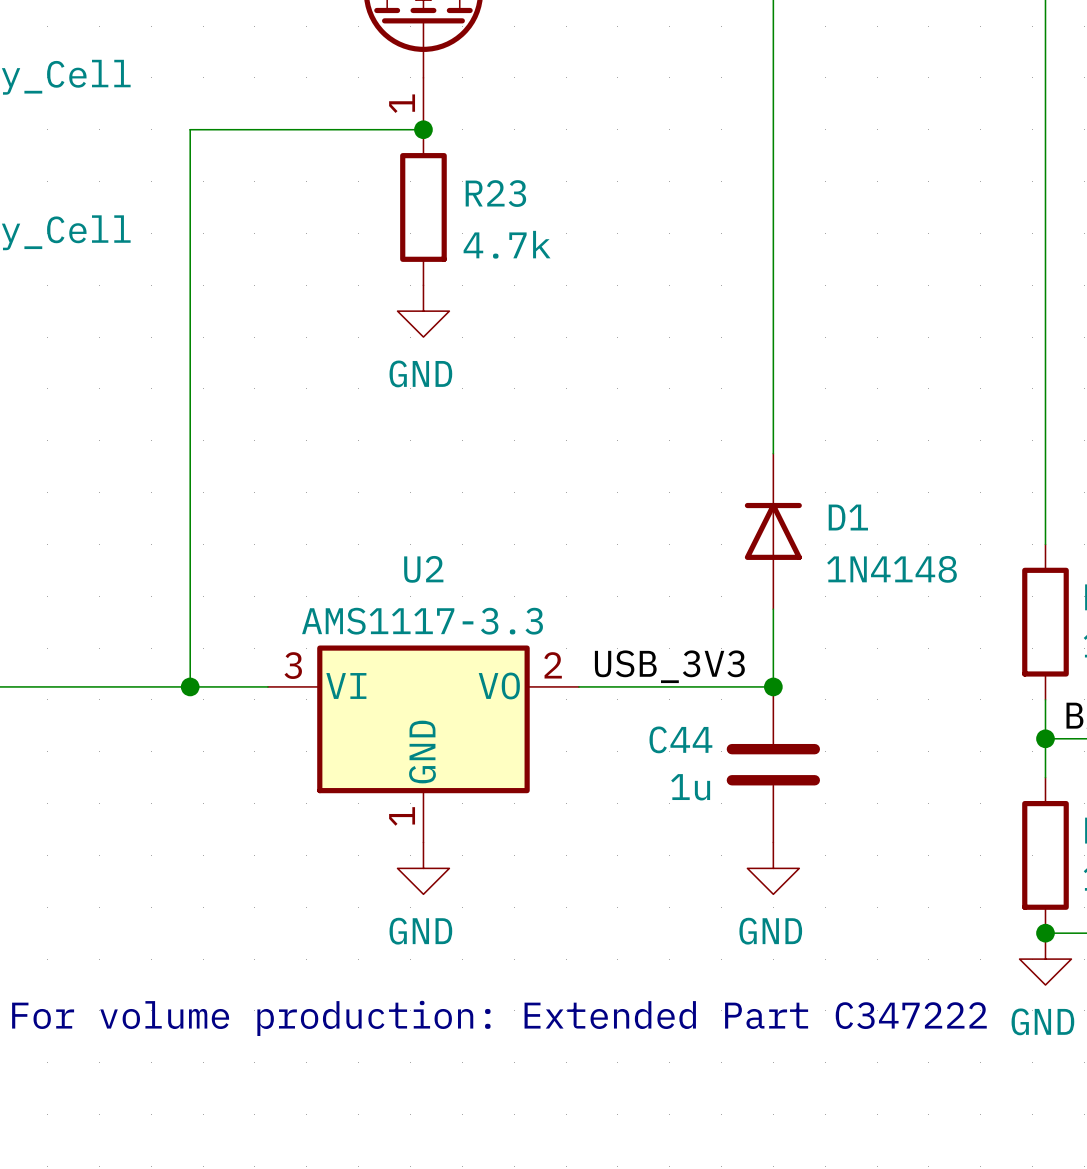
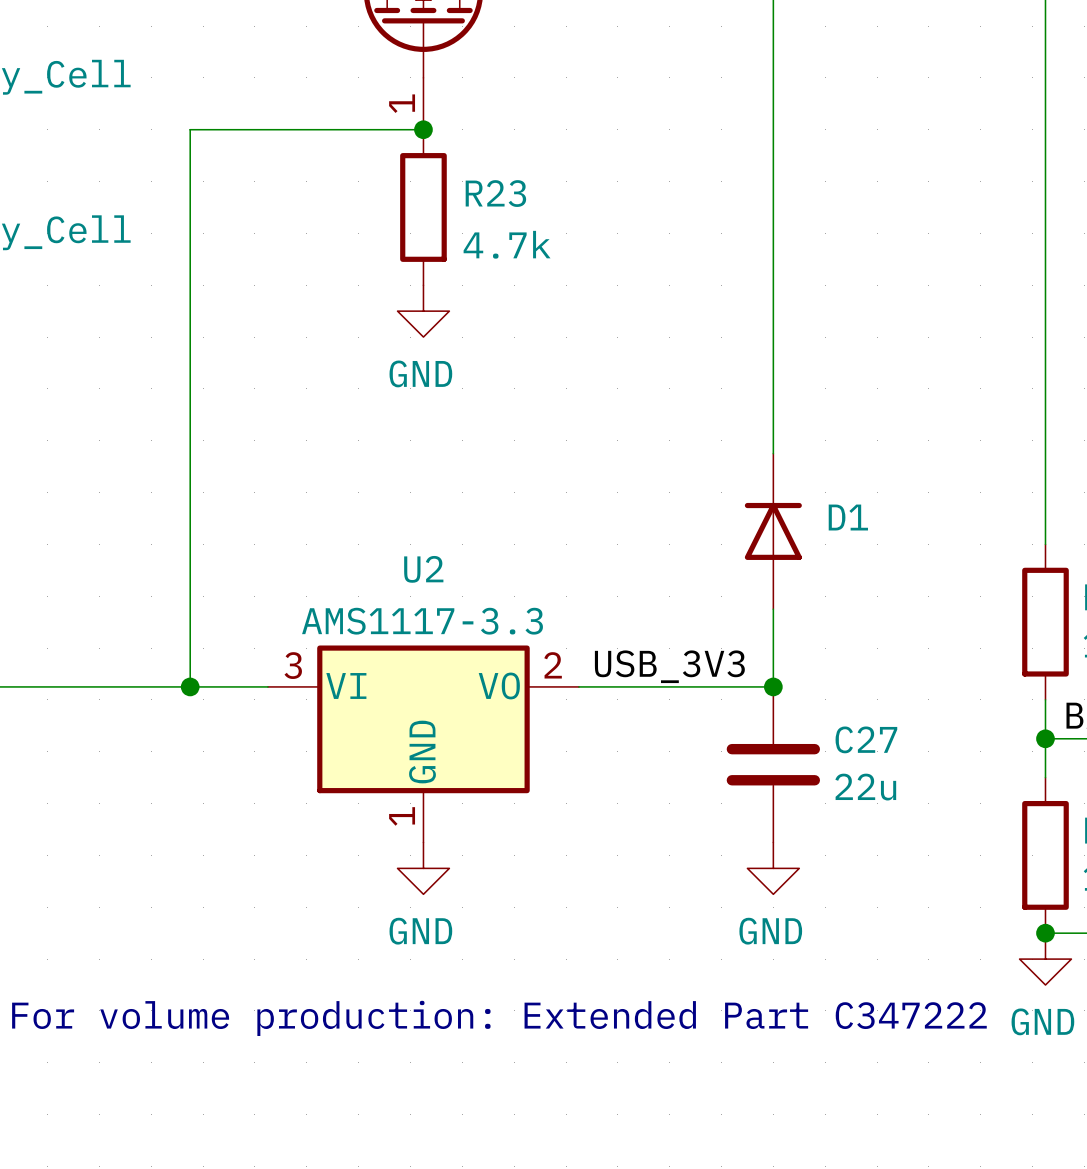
D1 value: 1N4148 (891, 569) -> none
C44 name: C44 (680, 739) -> C27 (866, 739)
C44 value: 1u (690, 787) -> 22u (865, 787)

